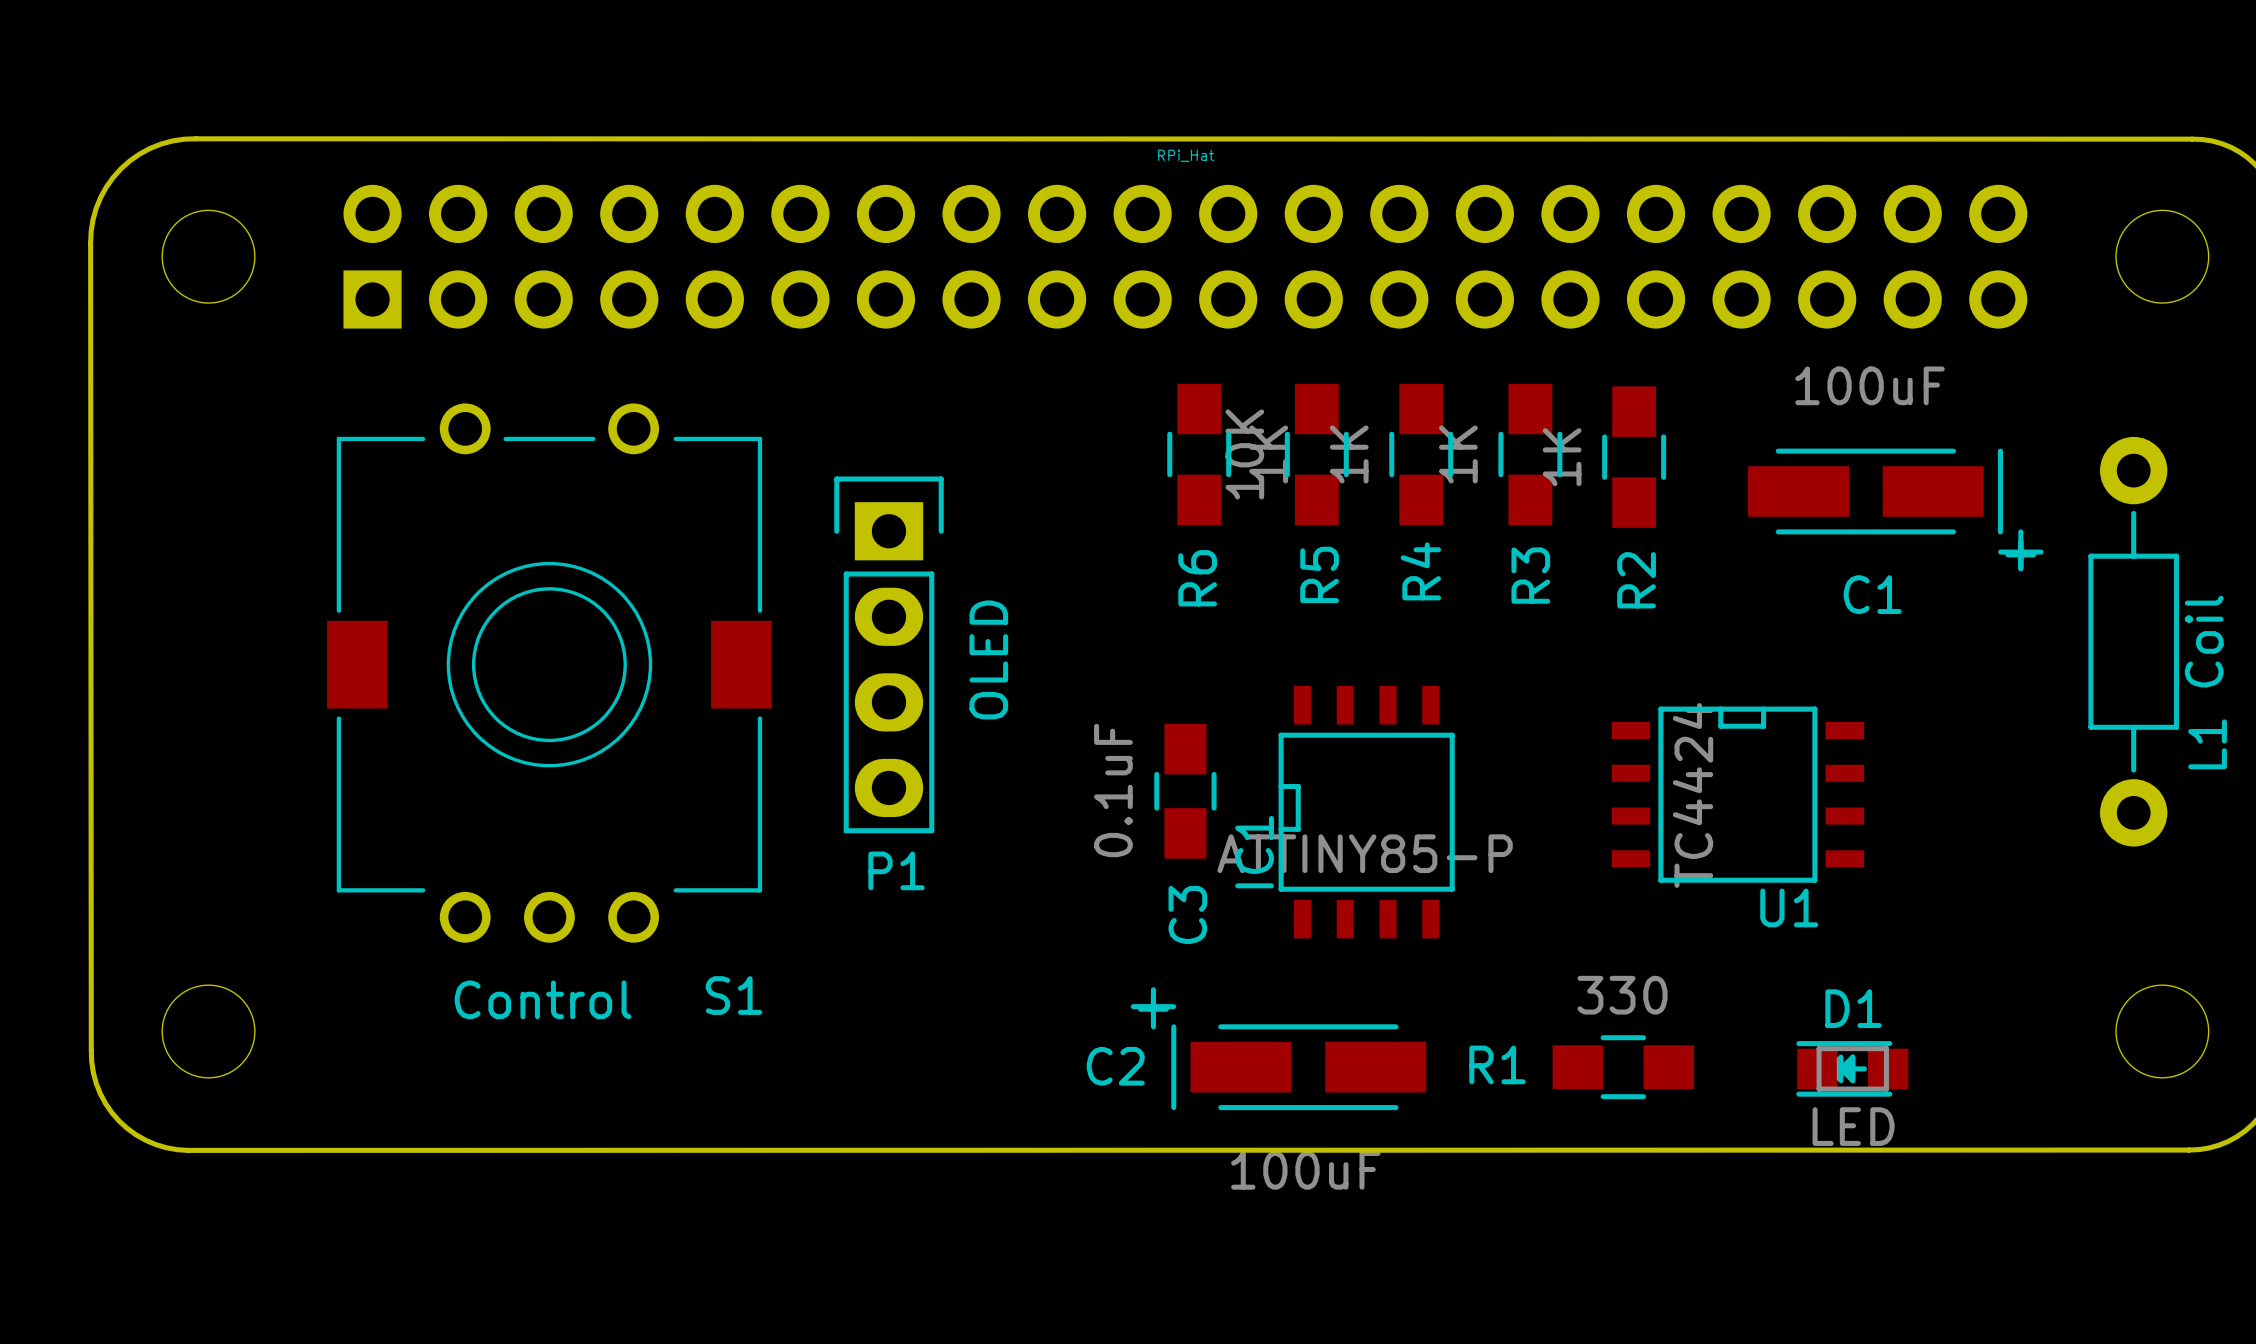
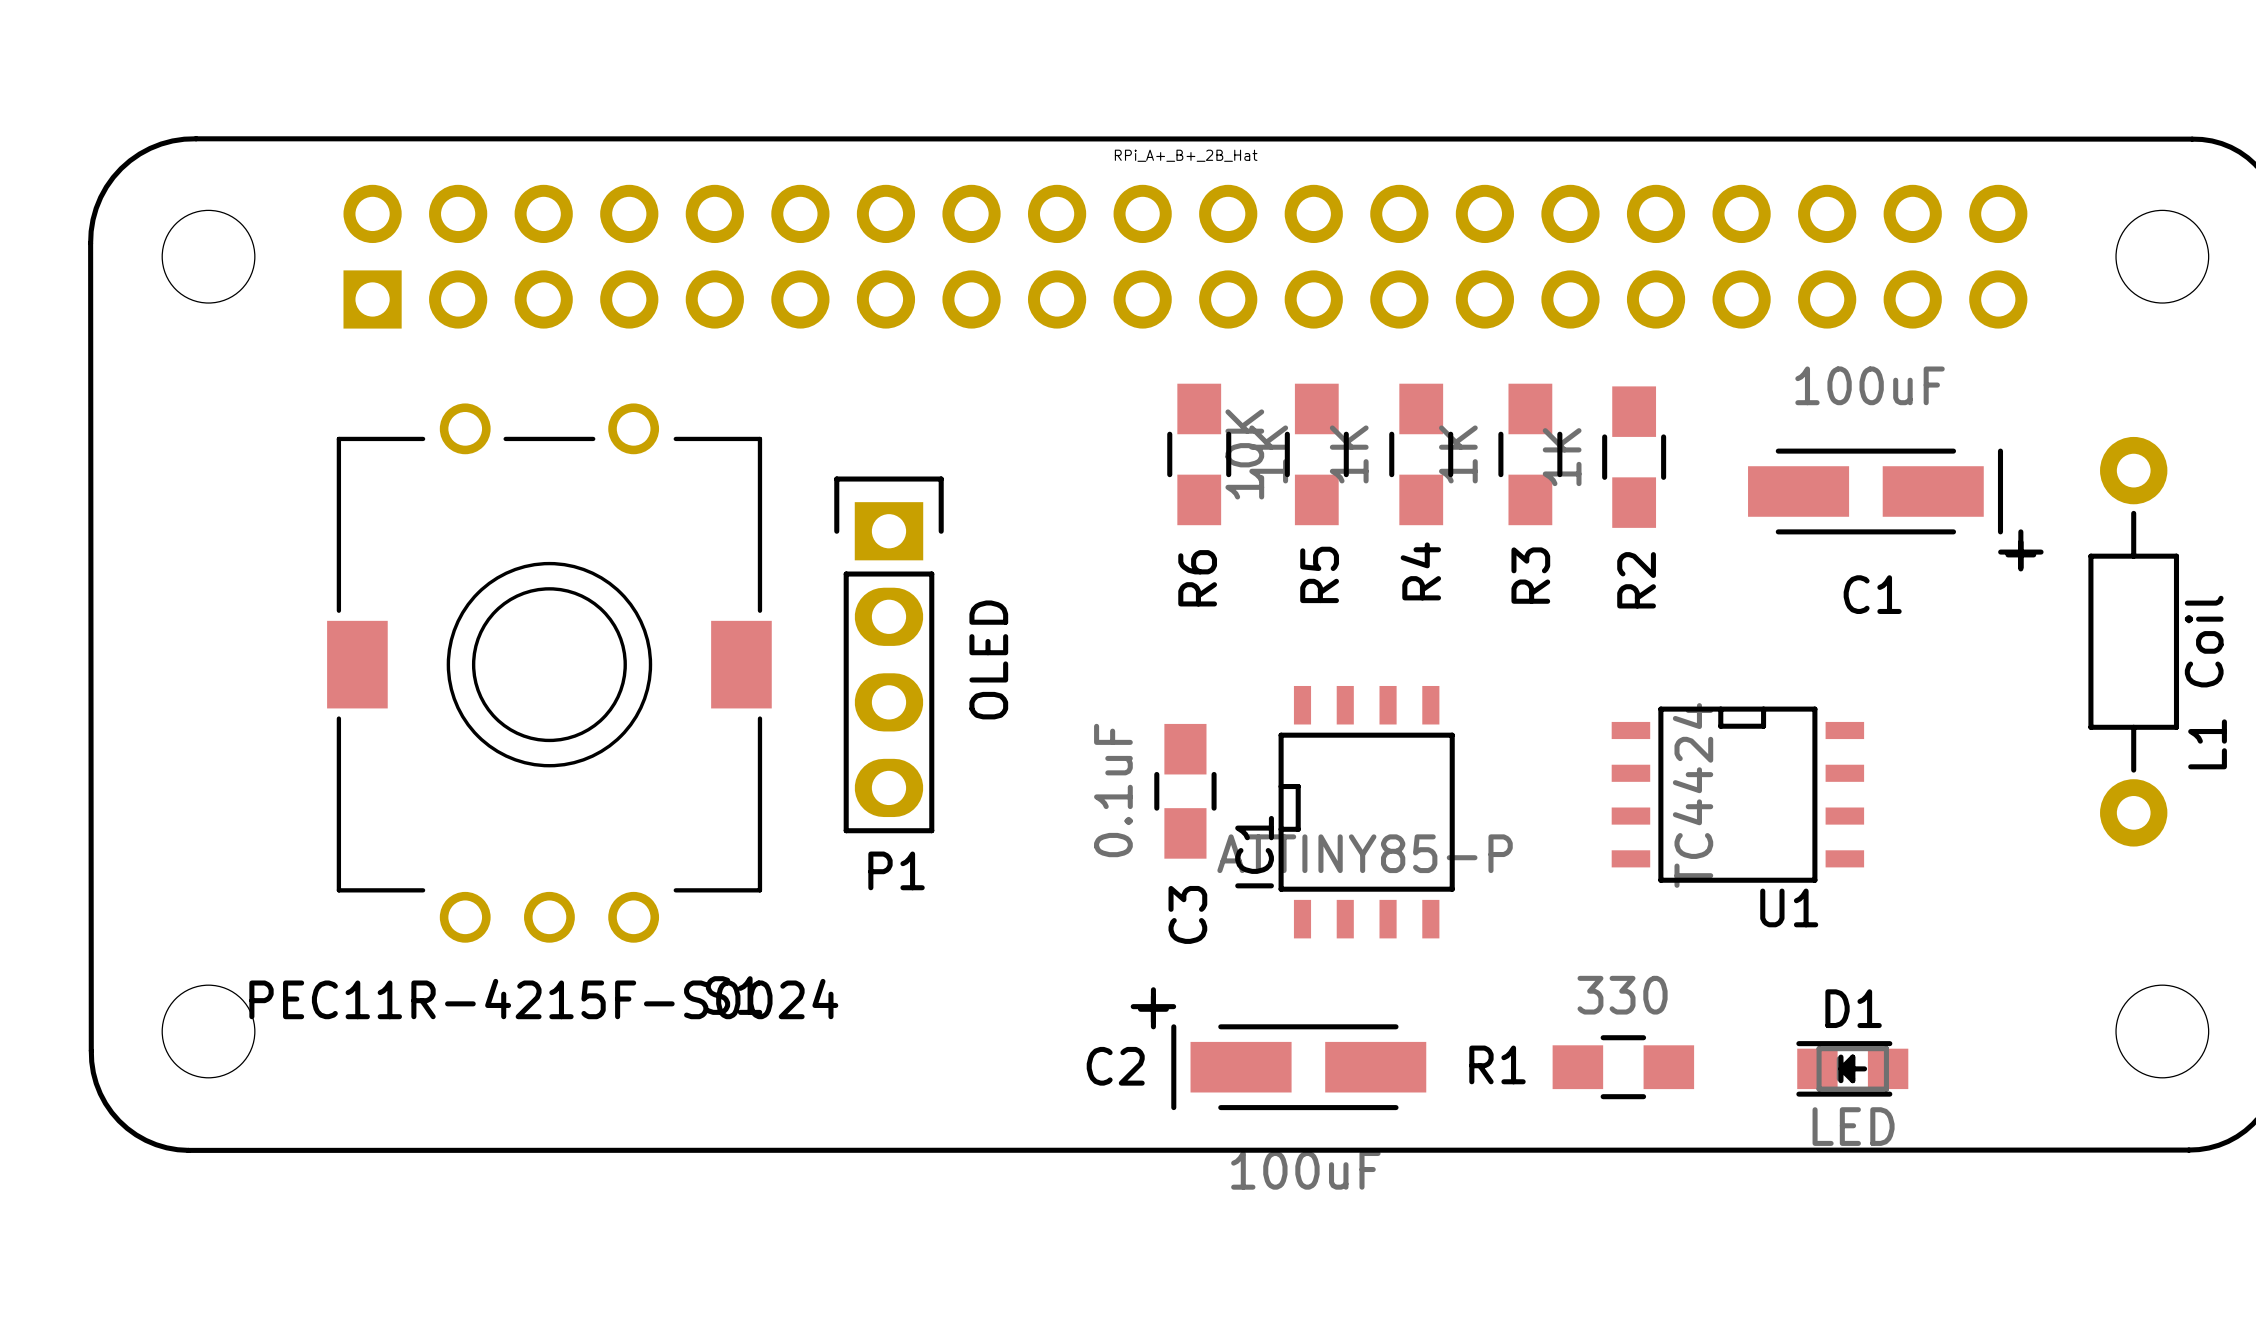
part value: RPi_Hat (1186, 155) -> RPi_A+_B+_2B_Hat (1186, 155)
S1 value: Control (543, 999) -> PEC11R-4215F-S0024 (543, 999)

